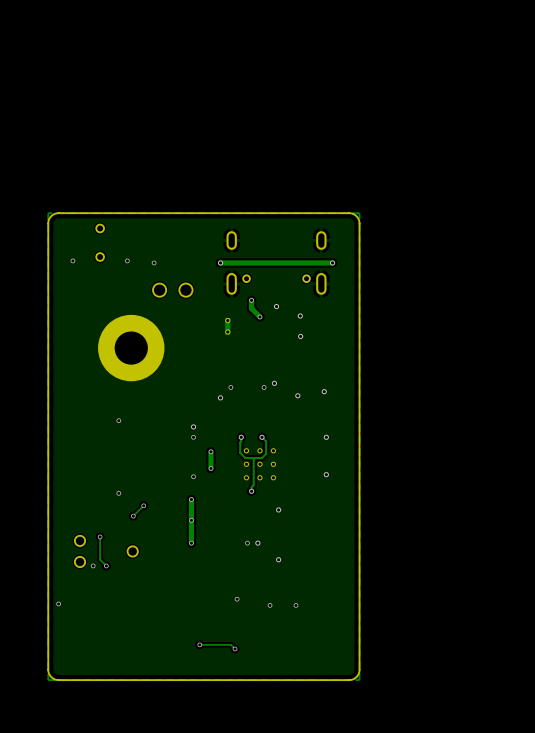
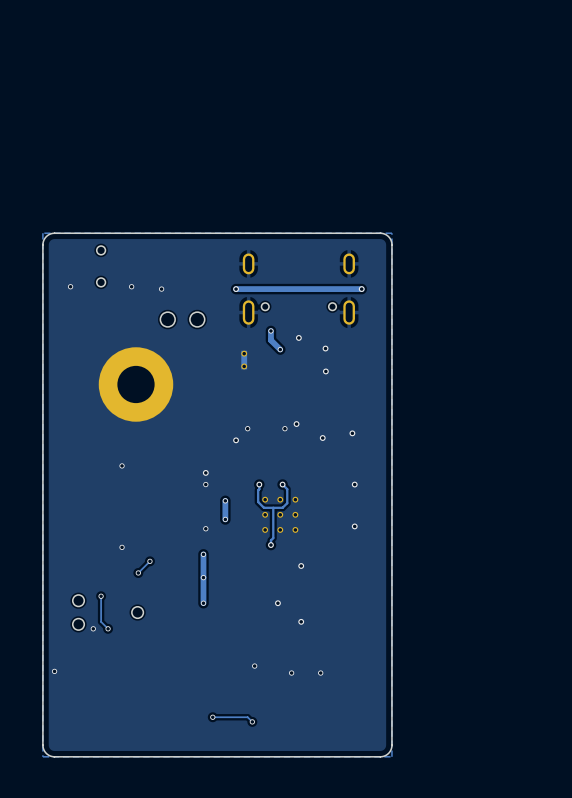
via: (247, 543) -> none

